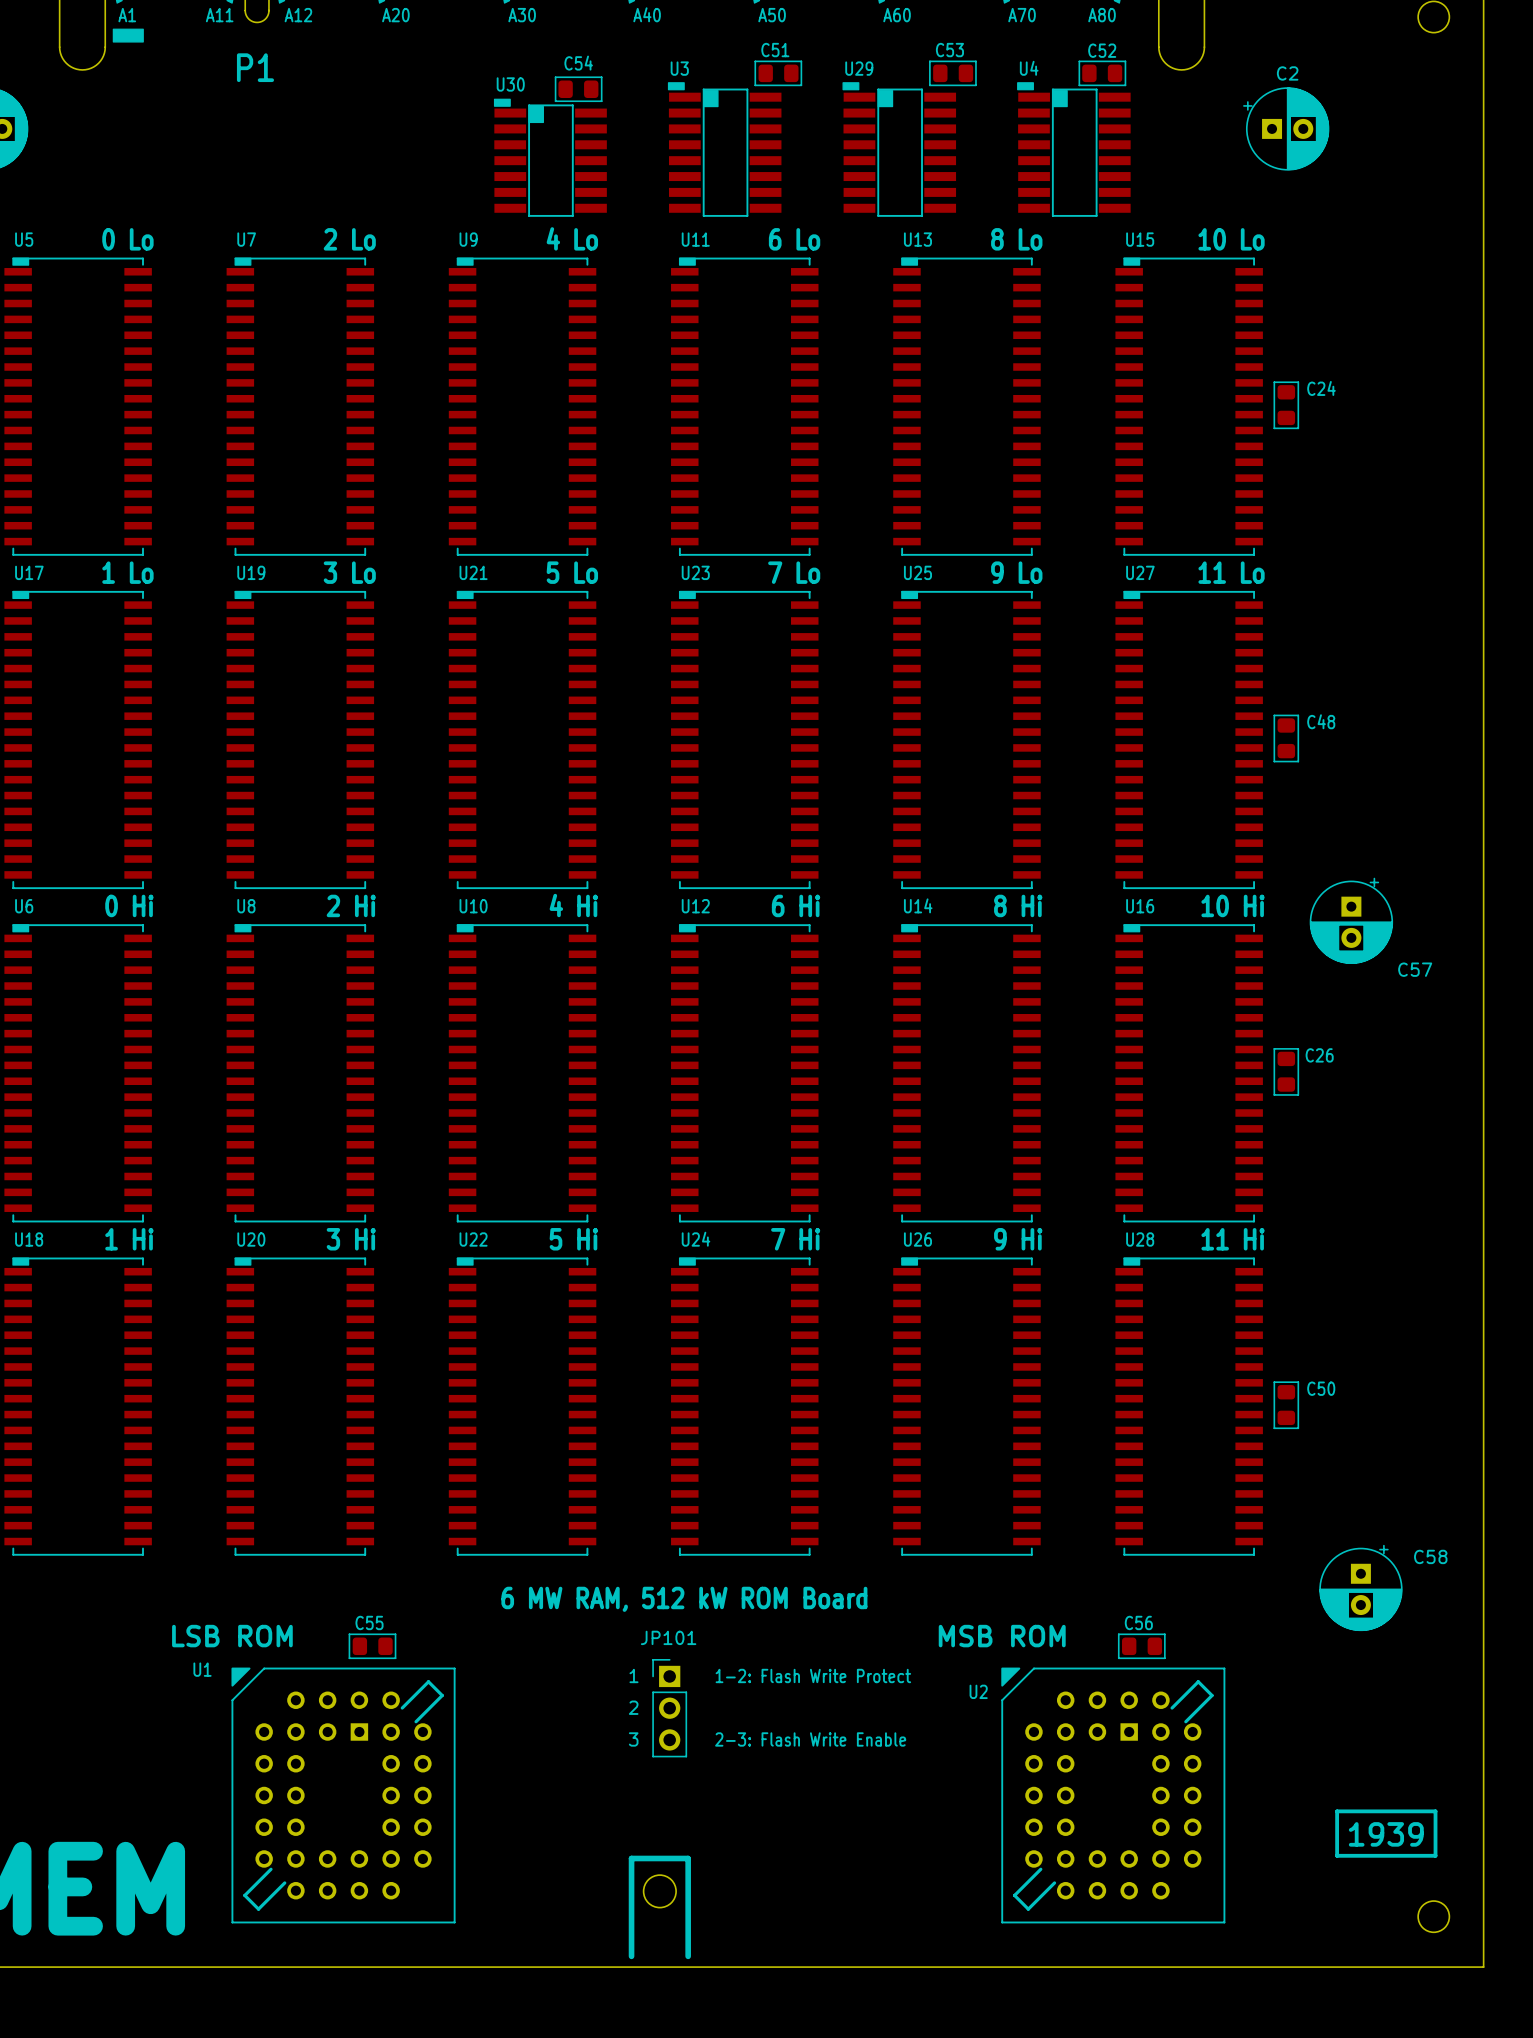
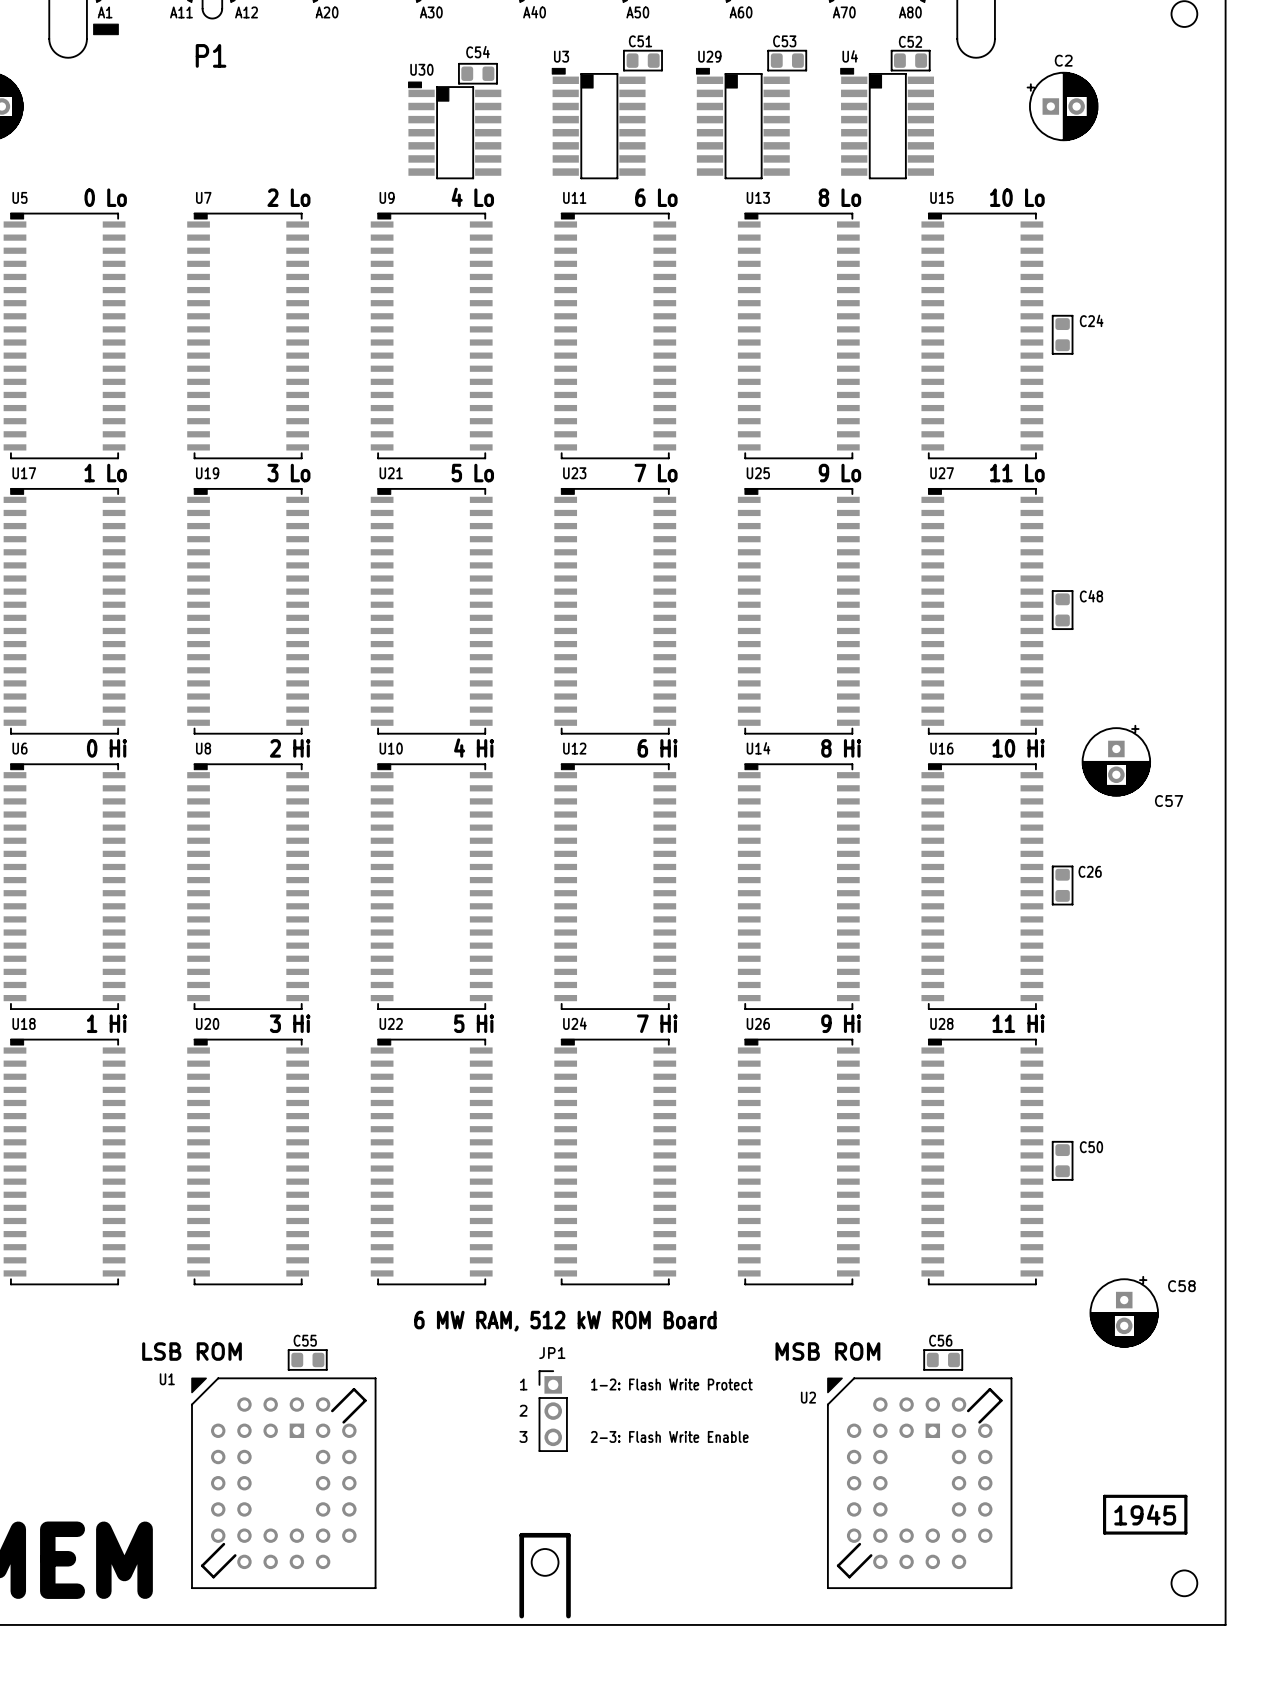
JP101 name: JP101 (668, 1637) -> JP1 (552, 1353)
text: 1939 (1386, 1834) -> 1945 (1145, 1514)

